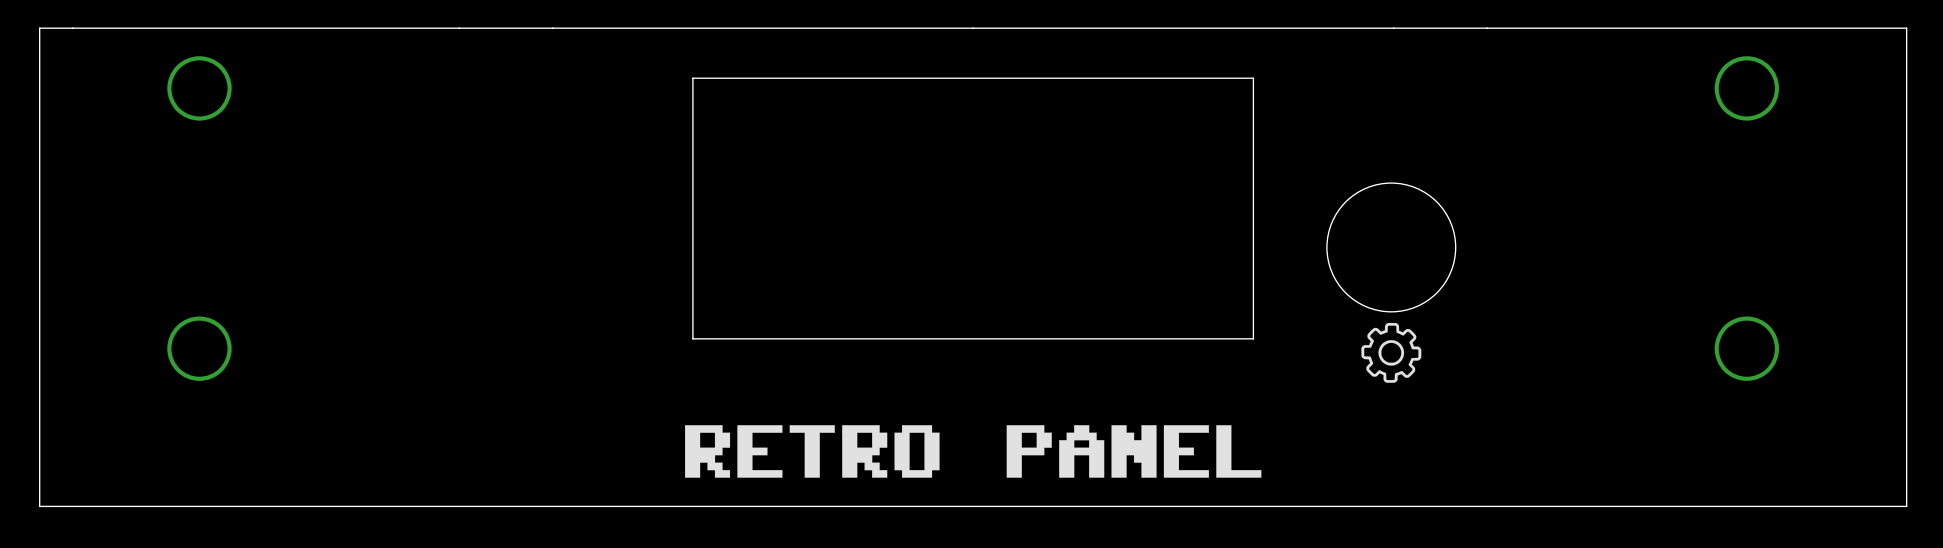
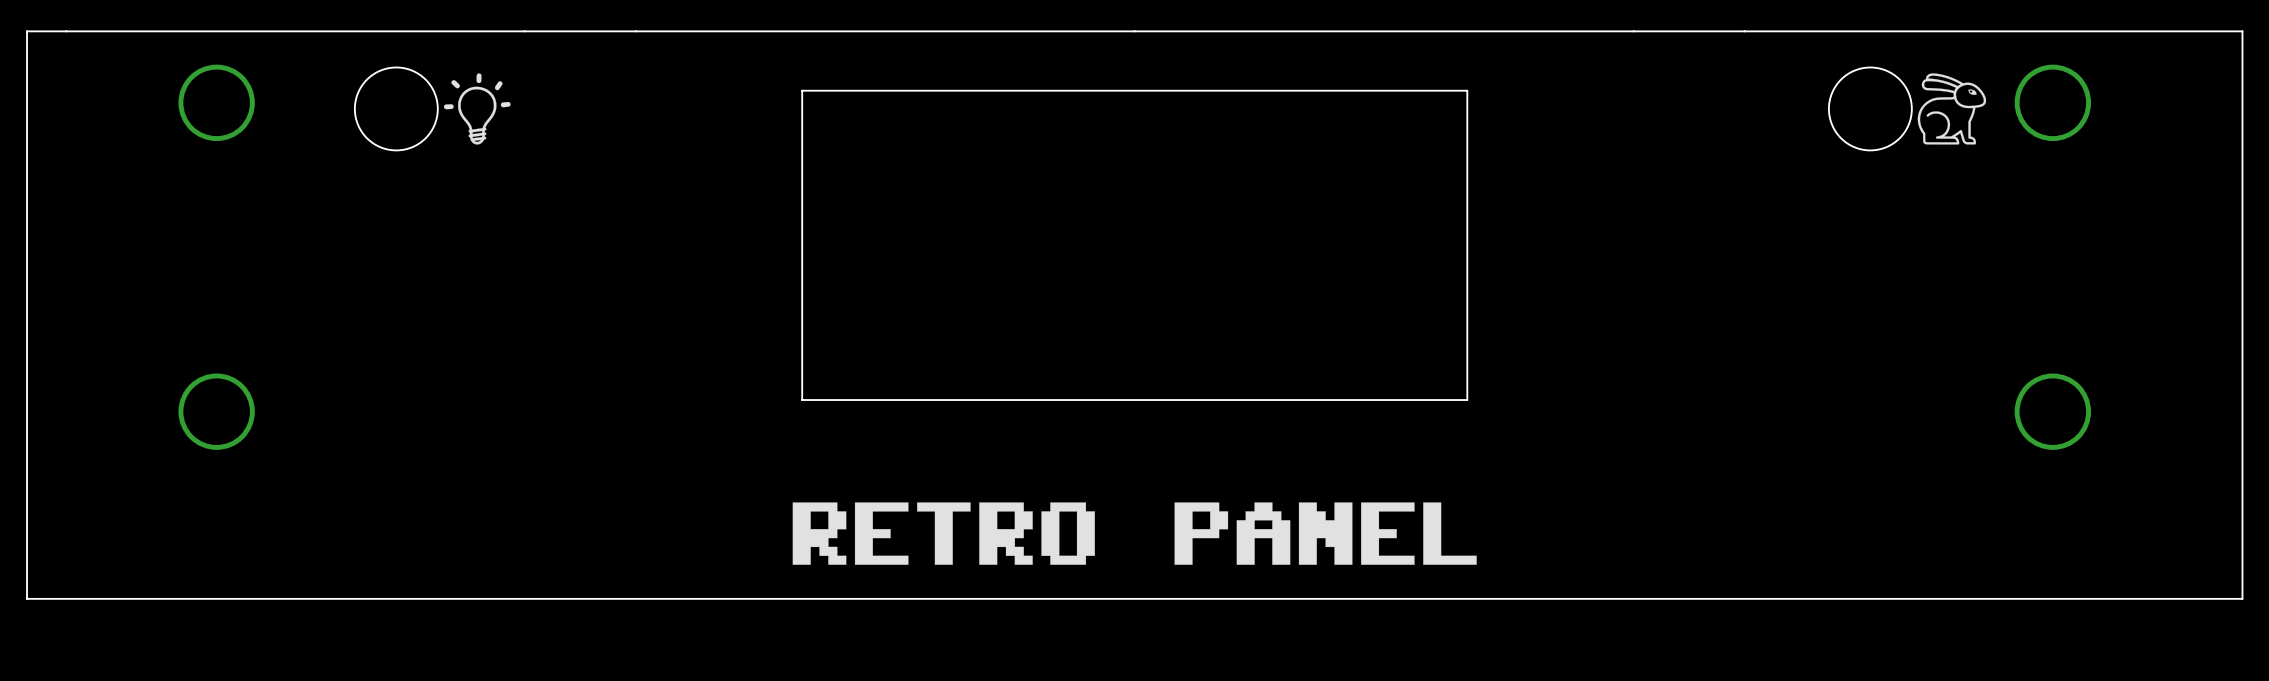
round board edge: none -> [354, 66, 439, 151]
round board edge: none -> [1828, 66, 1913, 151]
drawing: none -> [443, 73, 511, 145]
drawing: none -> [1917, 73, 1987, 145]
round board edge: [1326, 182, 1457, 313] -> none
drawing: [1361, 322, 1422, 383] -> none

